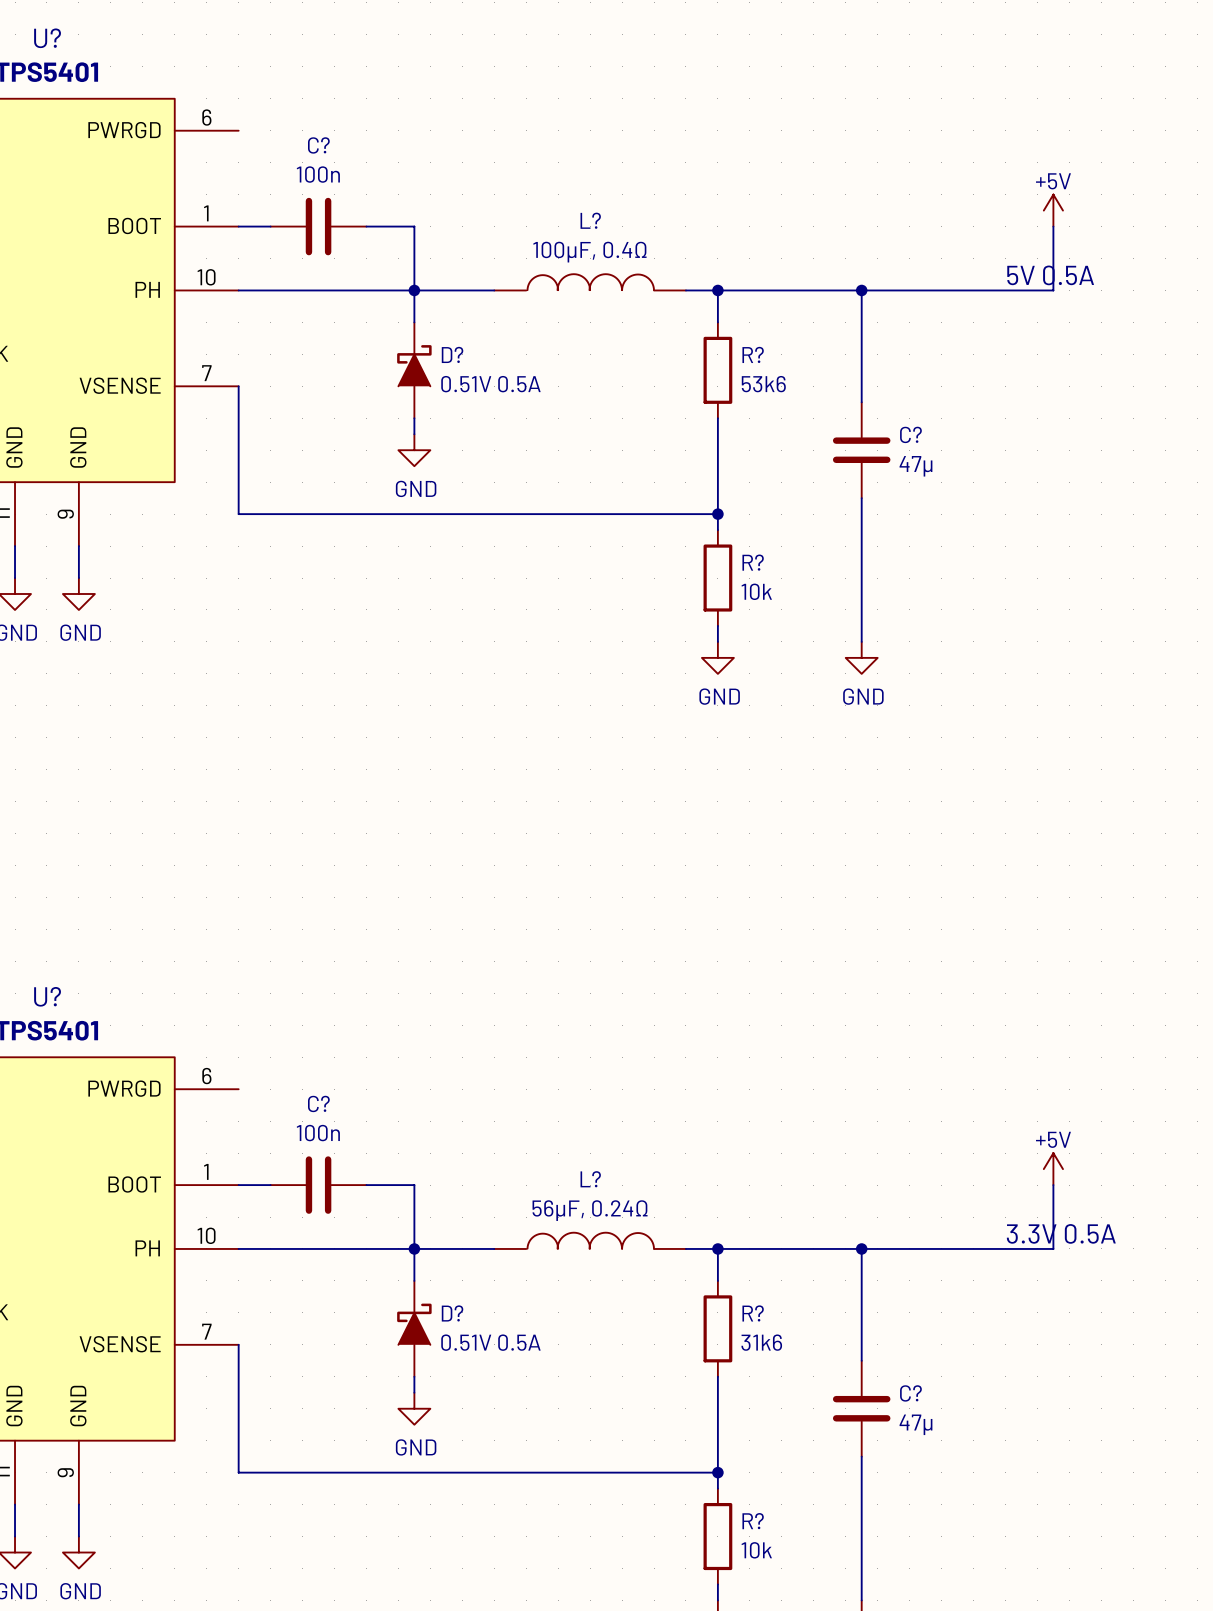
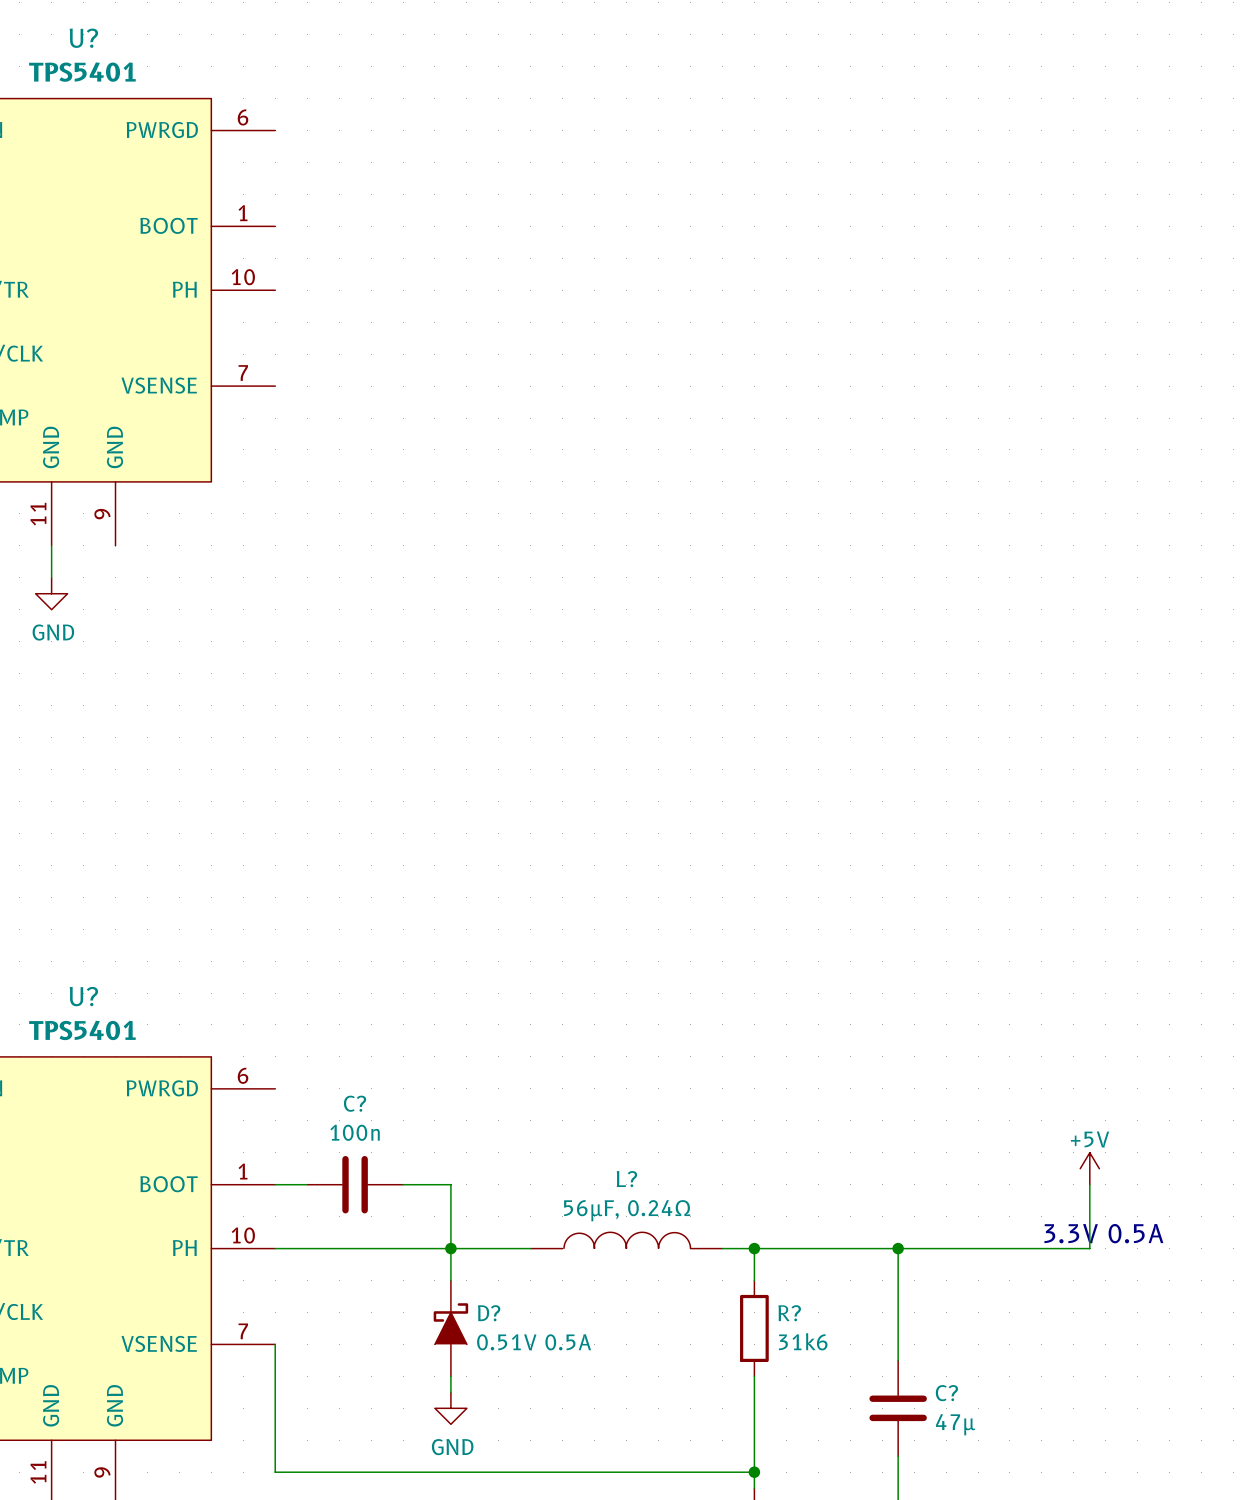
power symbol: +5V (1053, 210) -> none
wire: (238, 226) (270, 226) -> none
C?: 100n (318, 226) -> none
wire: (366, 226) (414, 226) (414, 322) -> none
wire: (1053, 226) (1053, 290) (685, 290) -> none
text: 5V 0.5A (1050, 275) -> none
L?: 100µF, 0.4Ω (590, 282) -> none
wire: (238, 290) (494, 290) -> none
junction: (414, 290) -> none
wire: (717, 290) (717, 322) -> none
junction: (717, 290) -> none
wire: (861, 290) (861, 402) -> none
junction: (861, 290) -> none
D?: 0.51V 0.5A (414, 370) -> none
R?: 53k6 (717, 370) -> none
wire: (238, 386) (238, 514) (717, 514) -> none
wire: (414, 418) (414, 434) -> none
wire: (717, 418) (717, 530) -> none
power symbol: GND (414, 450) -> none
C?: 47µ (861, 450) -> none
wire: (861, 498) (861, 641) -> none
junction: (717, 514) -> none
wire: (78, 546) (78, 578) -> none
R?: 10k (717, 578) -> none
power symbol: GND (78, 593) -> none
wire: (717, 625) (717, 641) -> none
power symbol: GND (717, 657) -> none
power symbol: GND (861, 657) -> none

